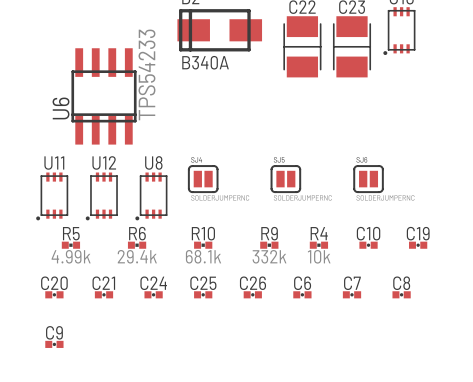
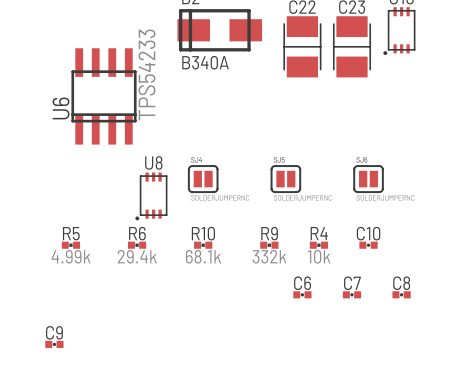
U11: (52, 196) -> none
U12: (101, 196) -> none
C19: (418, 245) -> none
C20: (54, 294) -> none
C21: (104, 294) -> none
C24: (153, 294) -> none
C25: (203, 294) -> none
C26: (252, 294) -> none

